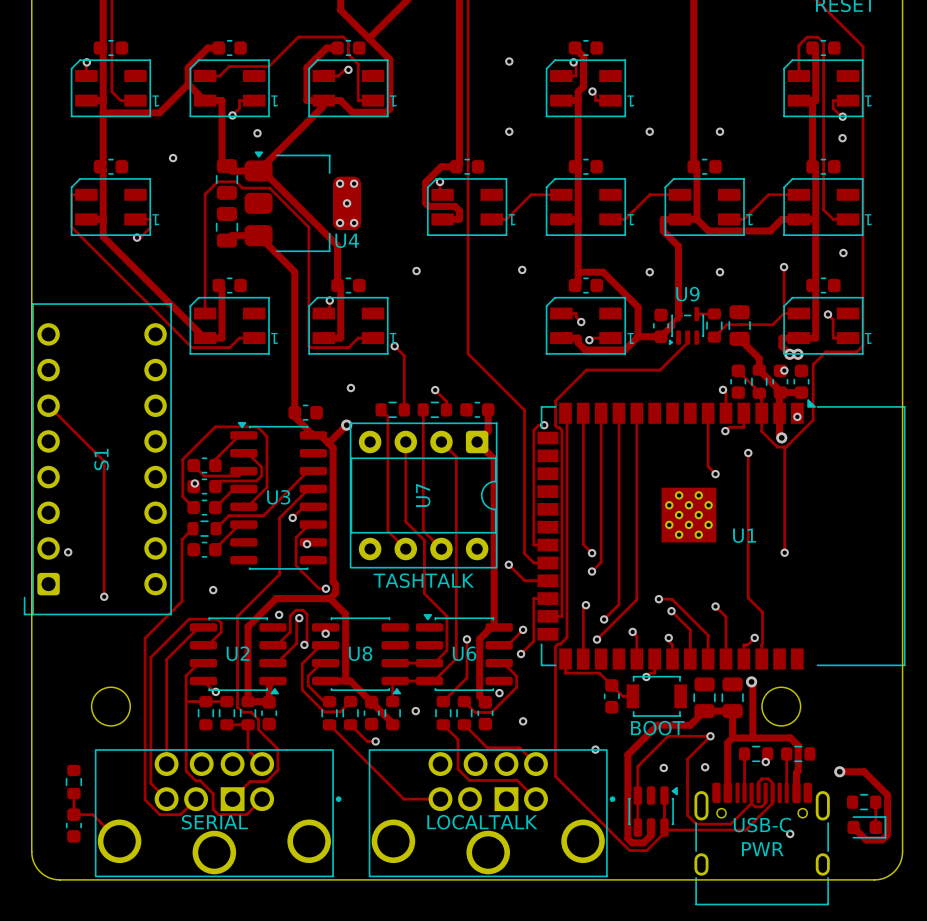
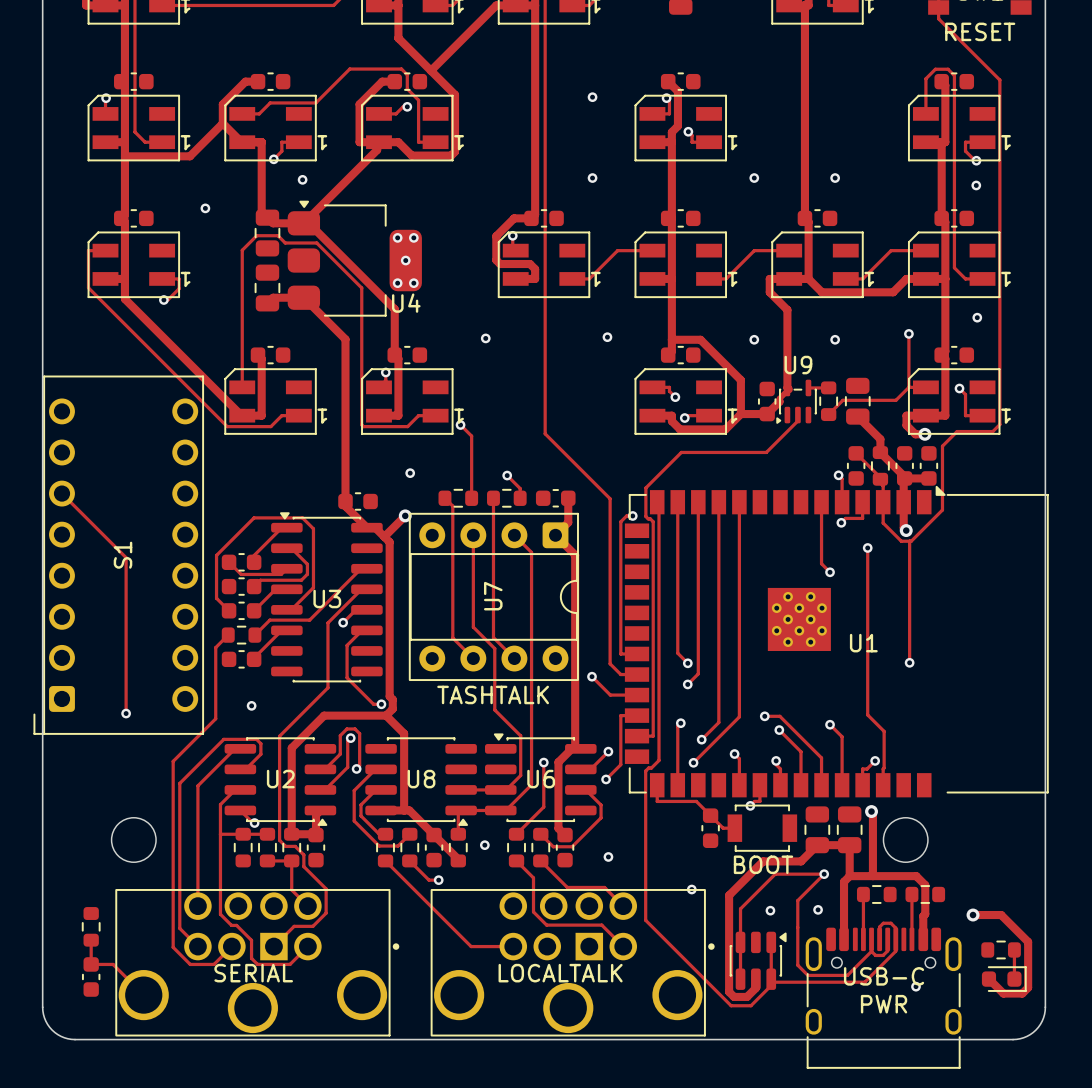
via: (789, 354) -> none
via: (784, 370) -> none
via: (797, 416) -> none
via: (194, 483) -> none
via: (307, 544) -> none
via: (68, 552) -> none
via: (279, 614) -> none
via: (325, 633) -> none
via: (499, 693) -> none
via: (765, 762) -> none

